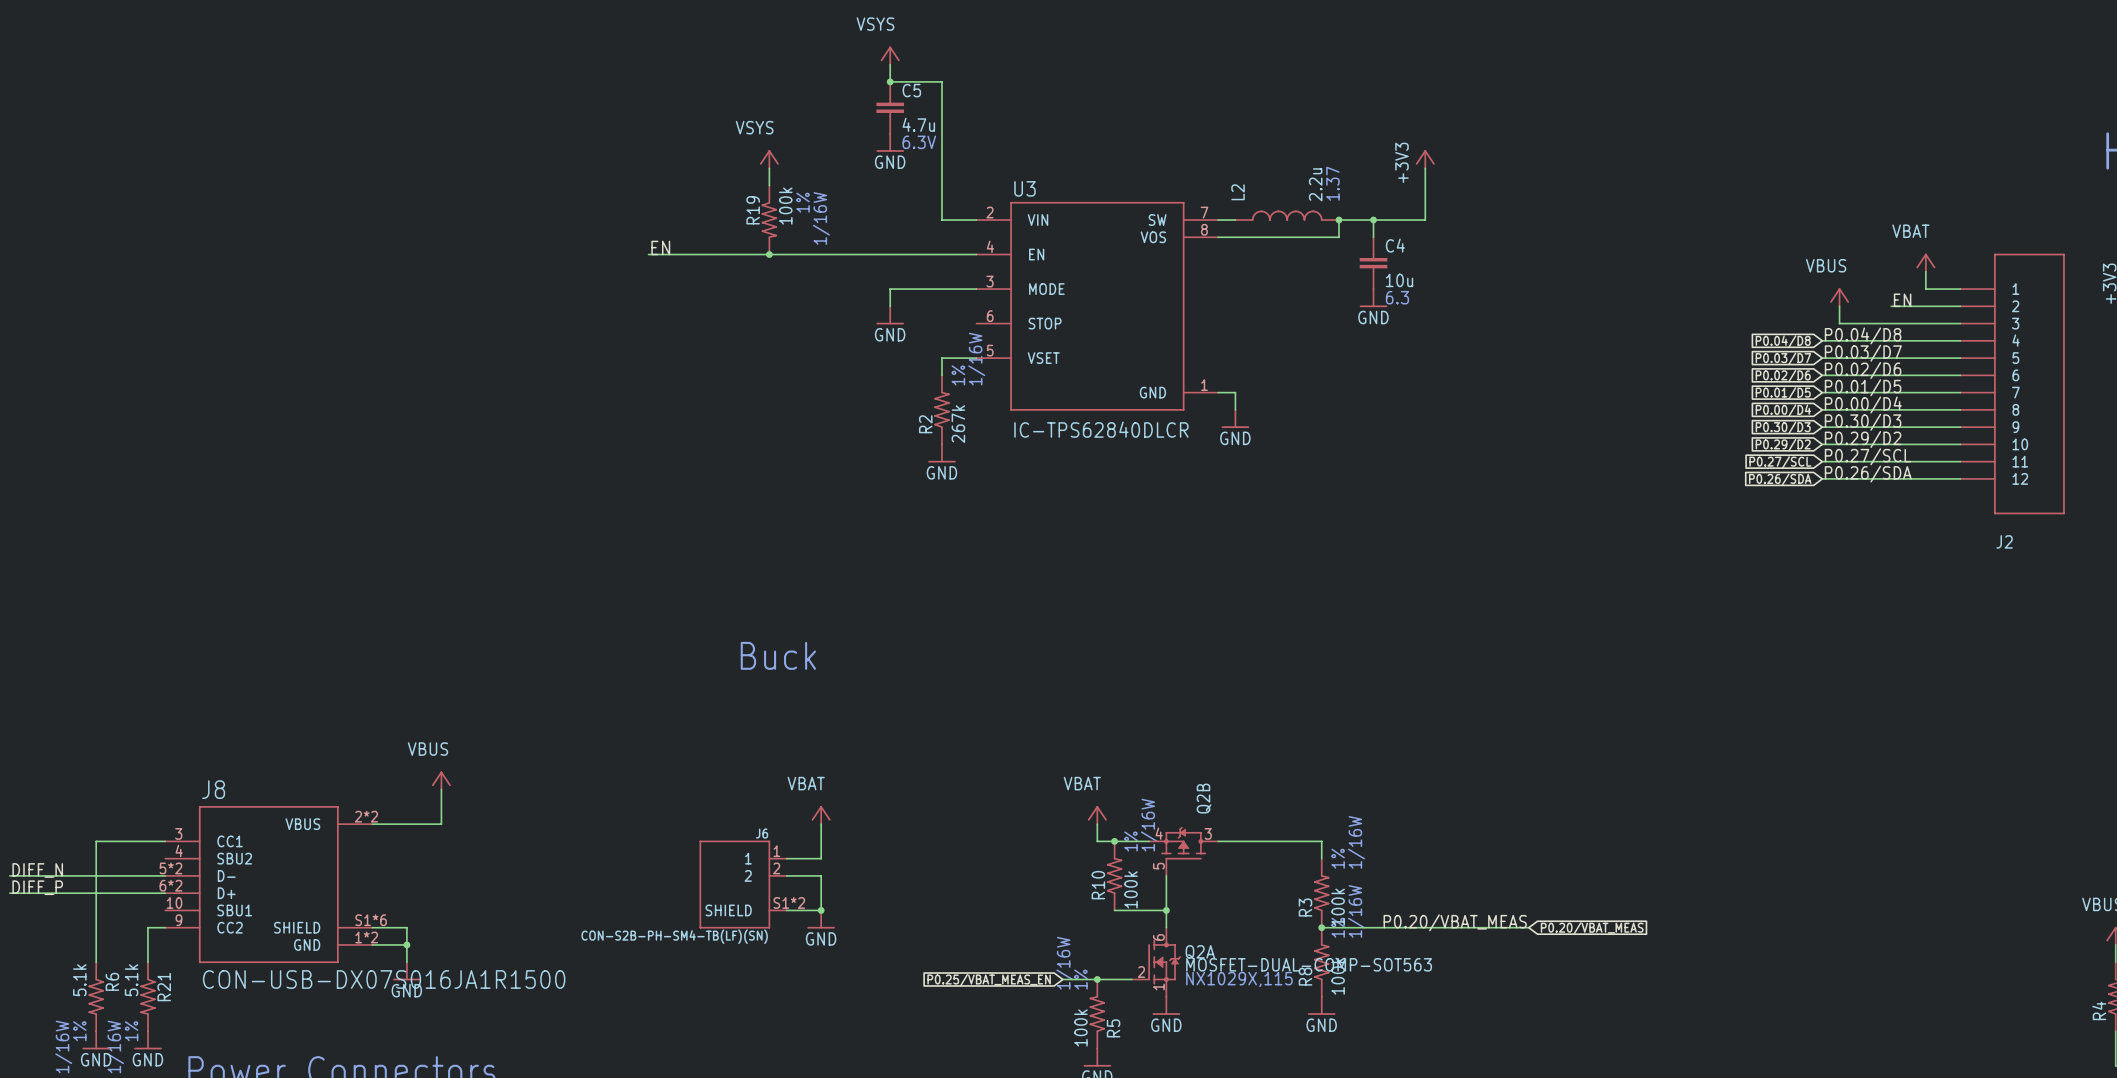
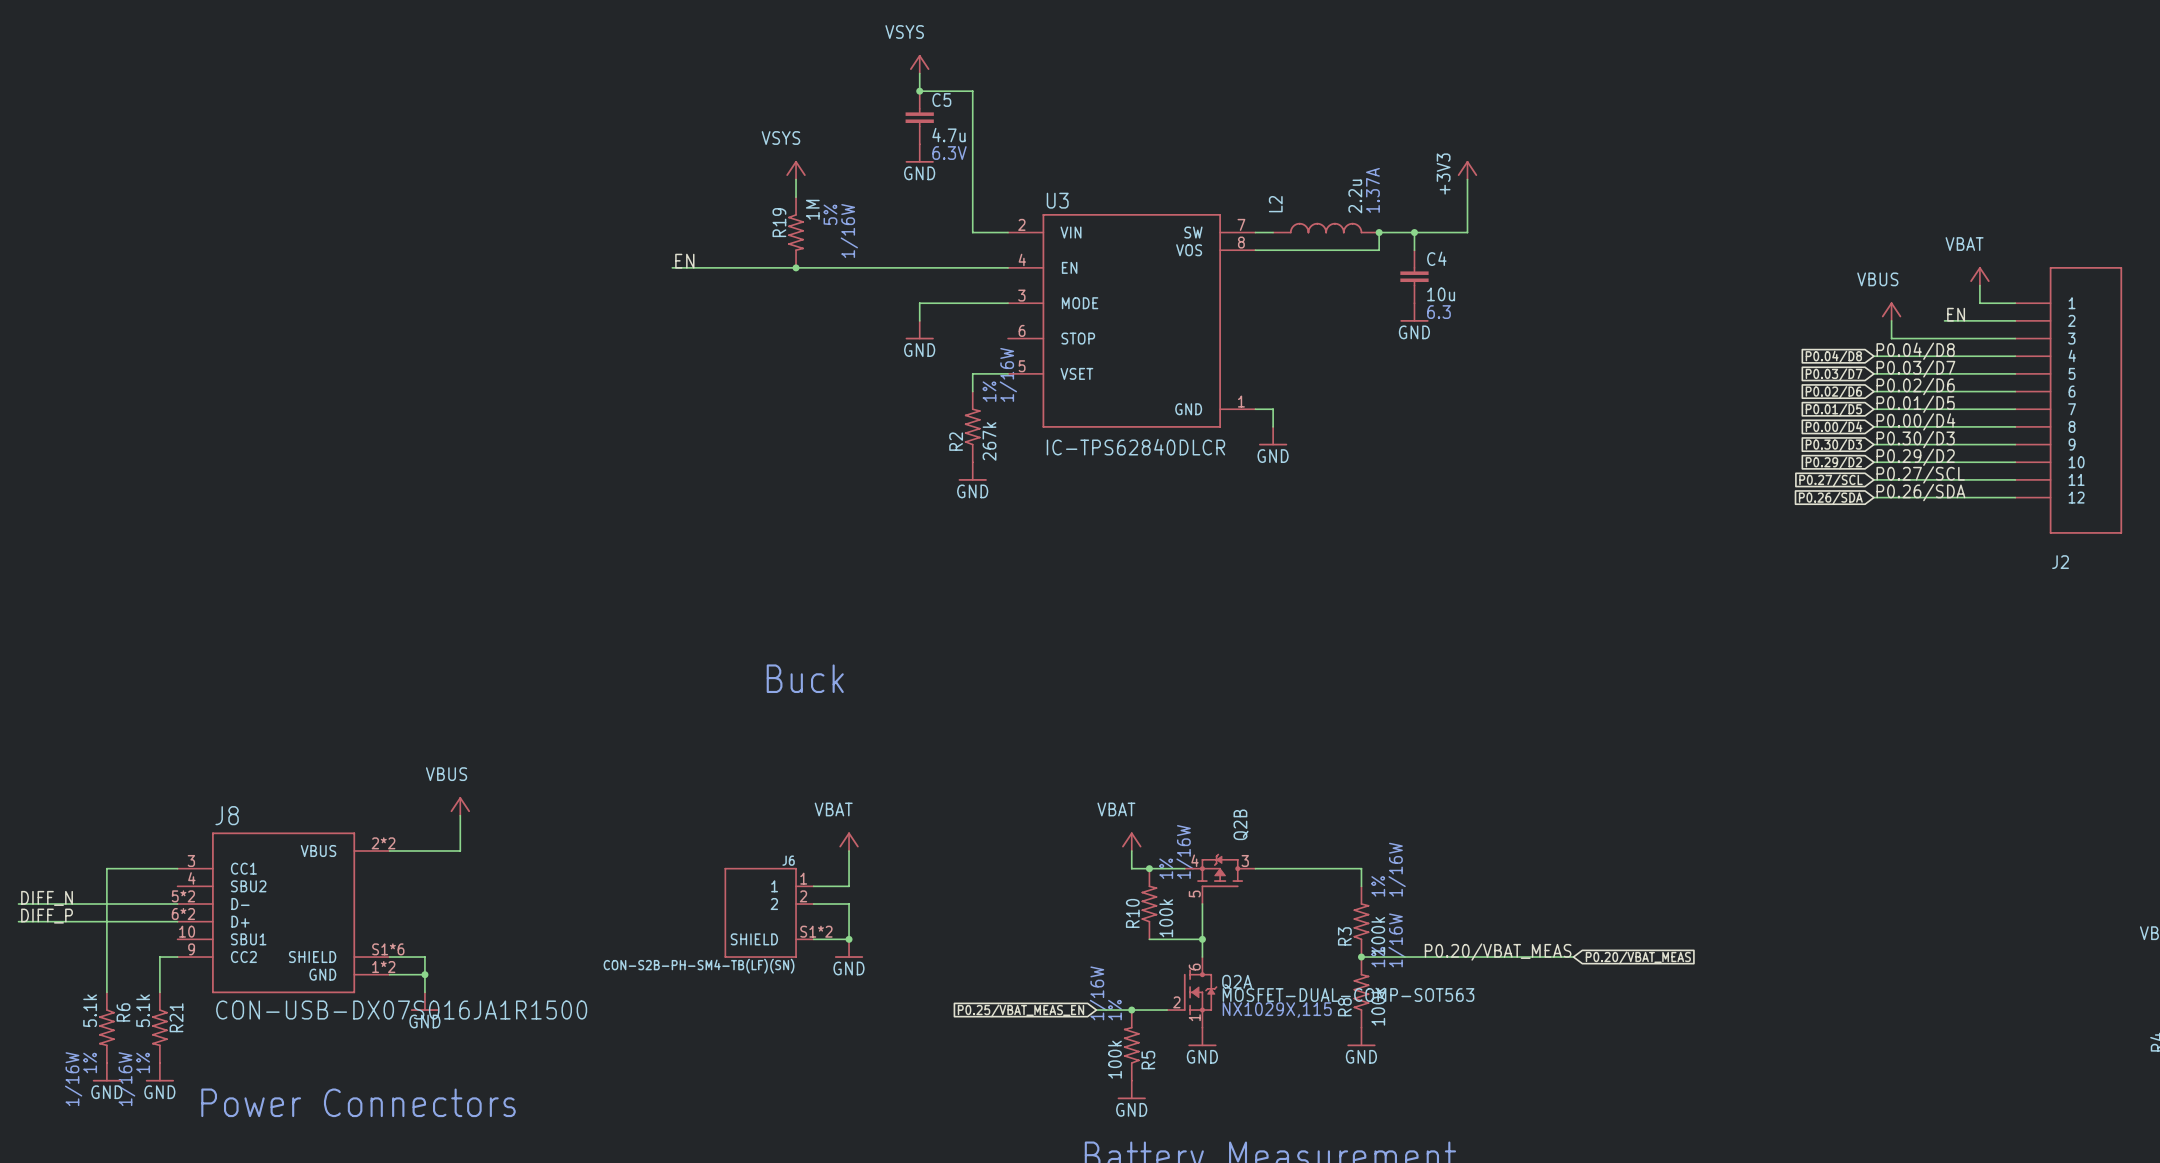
L2 text: 1.37 (1332, 183) -> 1.37A (1372, 190)
R19 text: 1% (803, 202) -> 5% (830, 214)
R19 value: 100k (785, 206) -> 1M (812, 209)

